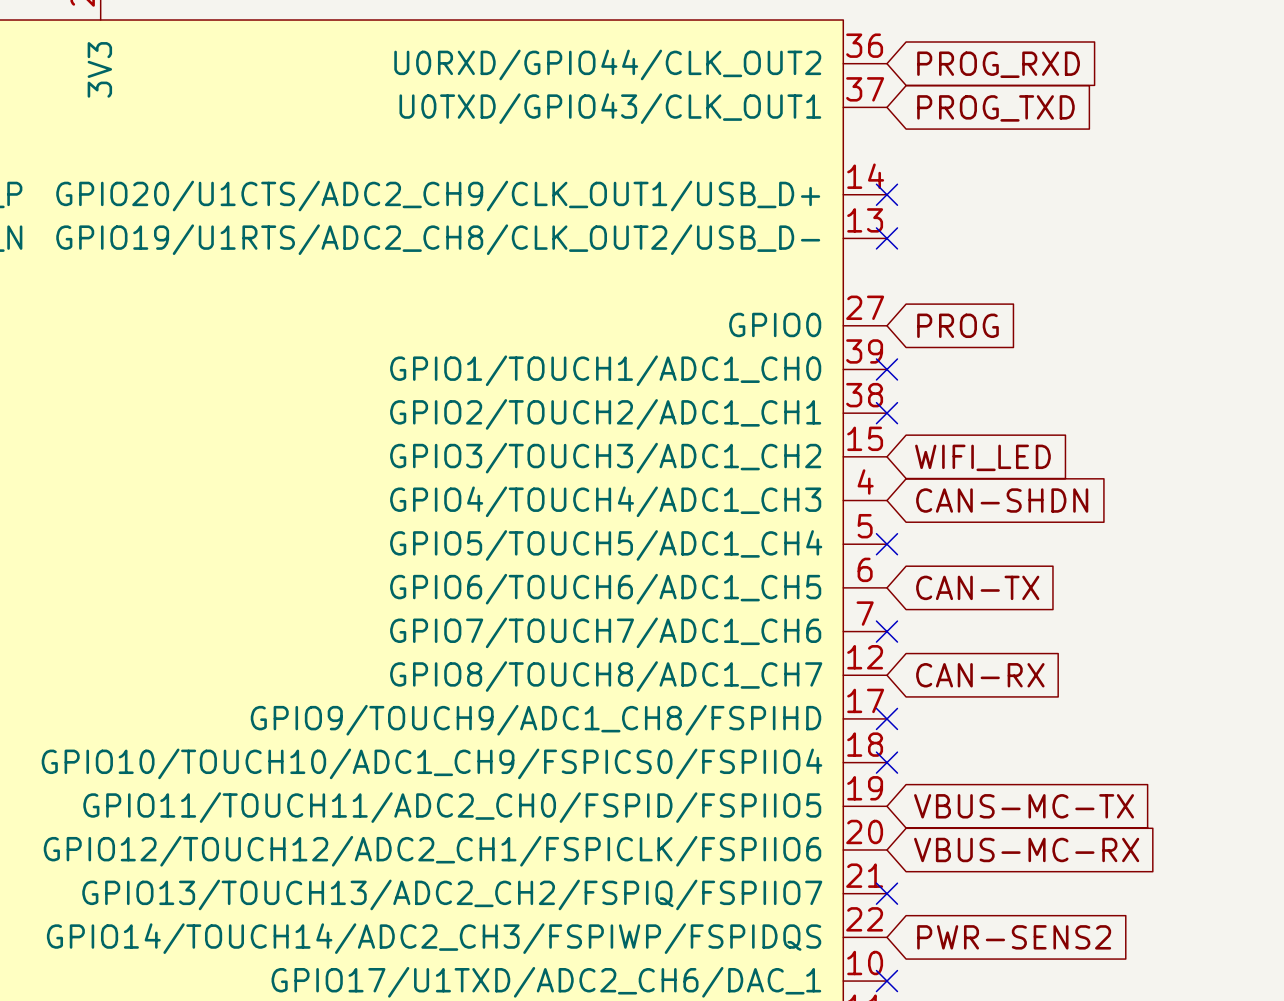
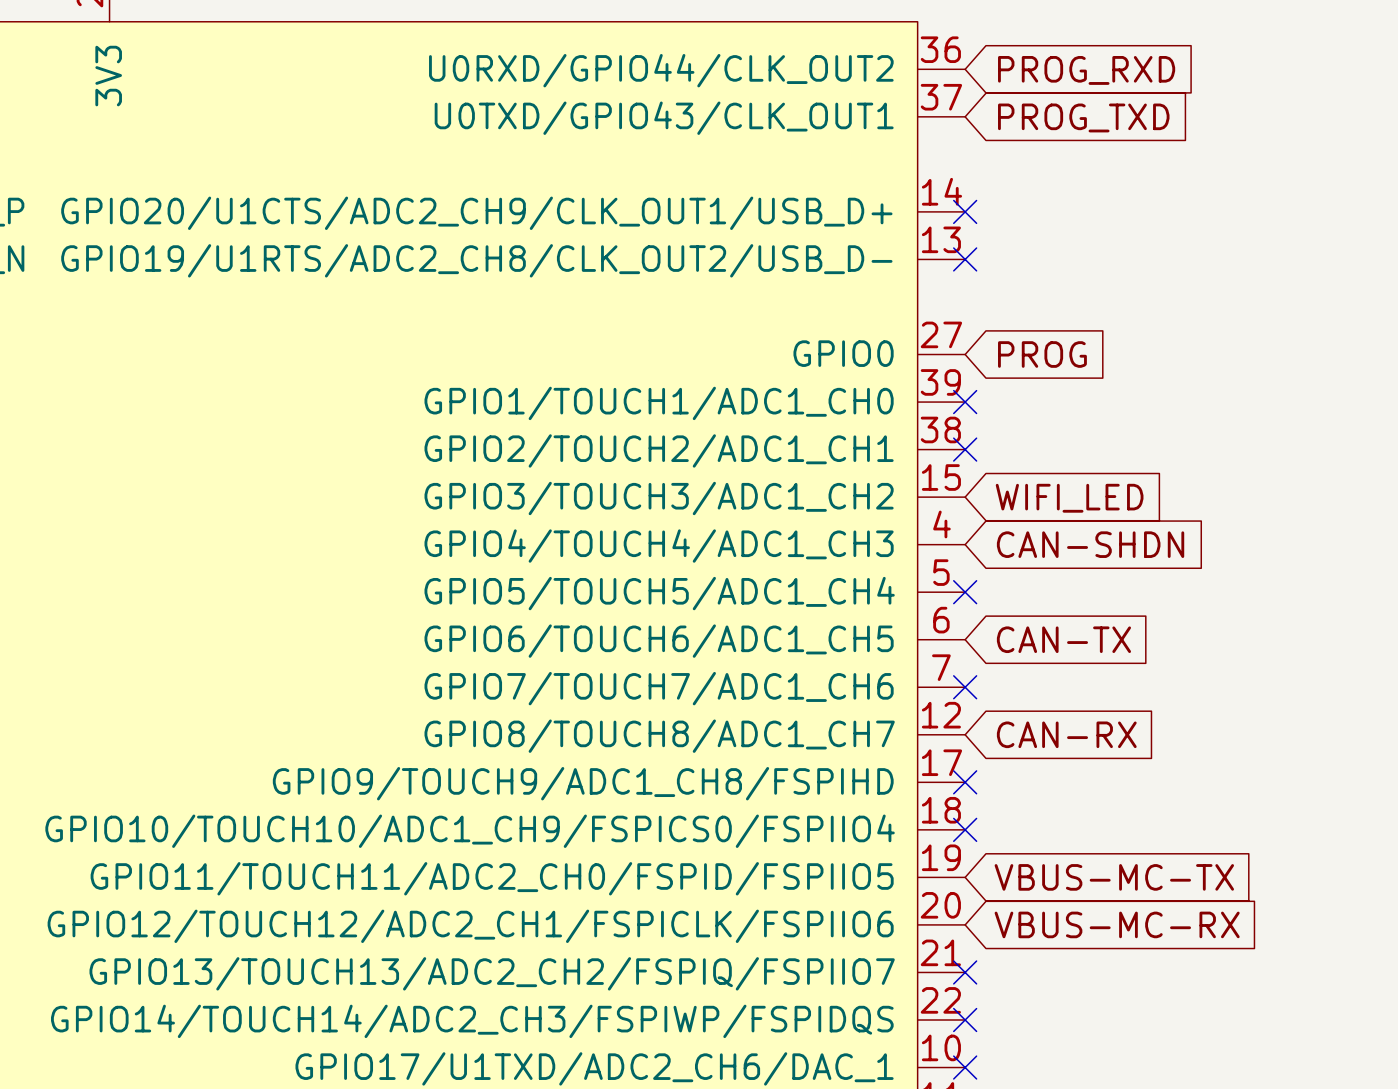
no-connect mark: none -> (965, 1020)
global label: PWR-SENS2 (1014, 937) -> none

